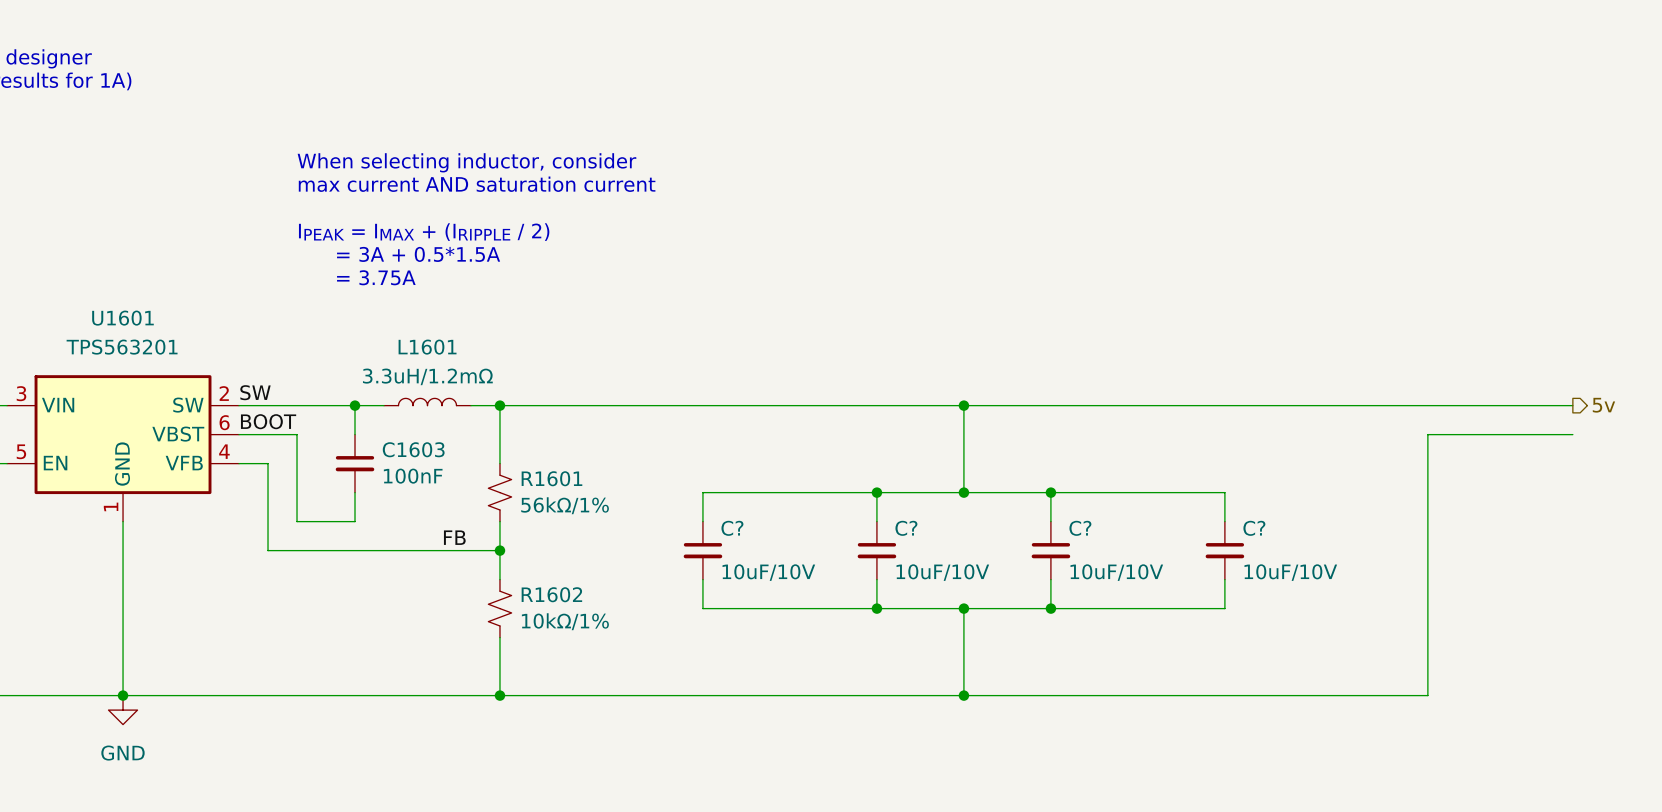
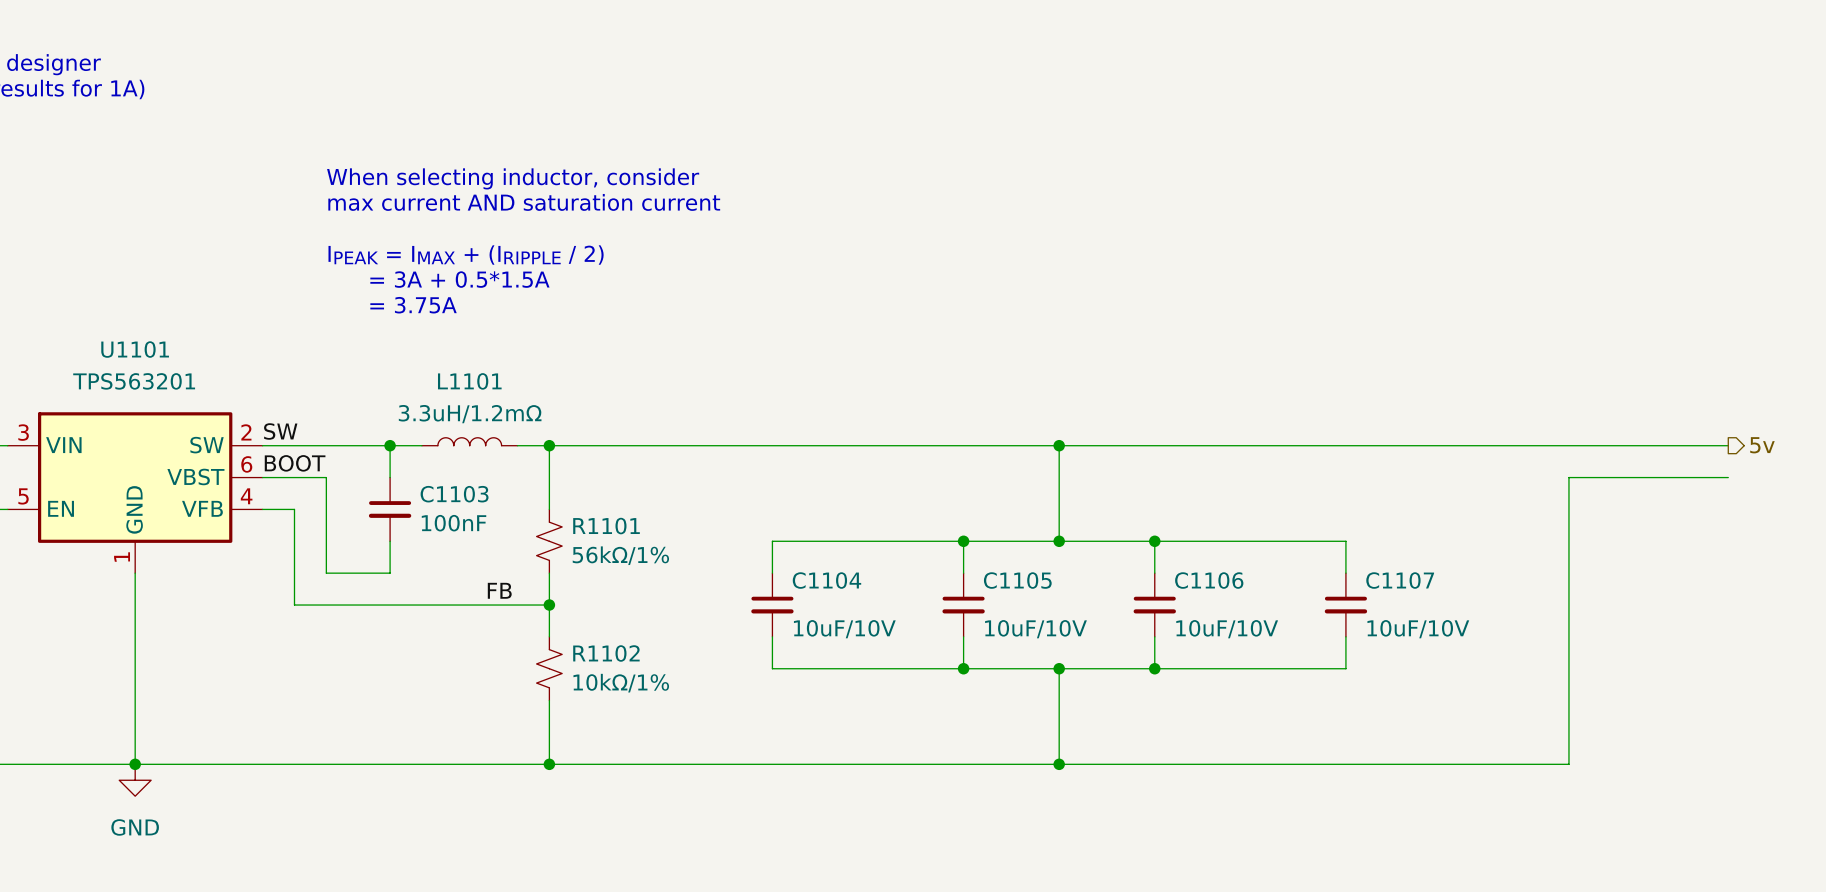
U1601 name: U1601 (122, 318) -> U1101 (135, 349)
L1601 name: L1601 (427, 347) -> L1101 (469, 381)
C1603 name: C1603 (413, 449) -> C1103 (454, 494)
R1601 name: R1601 (551, 478) -> R1101 (606, 526)
C? name: C? (732, 528) -> C1104 (826, 580)
C? name: C? (906, 528) -> C1105 (1017, 580)
C? name: C? (1080, 528) -> C1106 (1209, 580)
C? name: C? (1254, 528) -> C1107 (1400, 580)
R1602 name: R1602 (551, 594) -> R1102 (606, 653)

